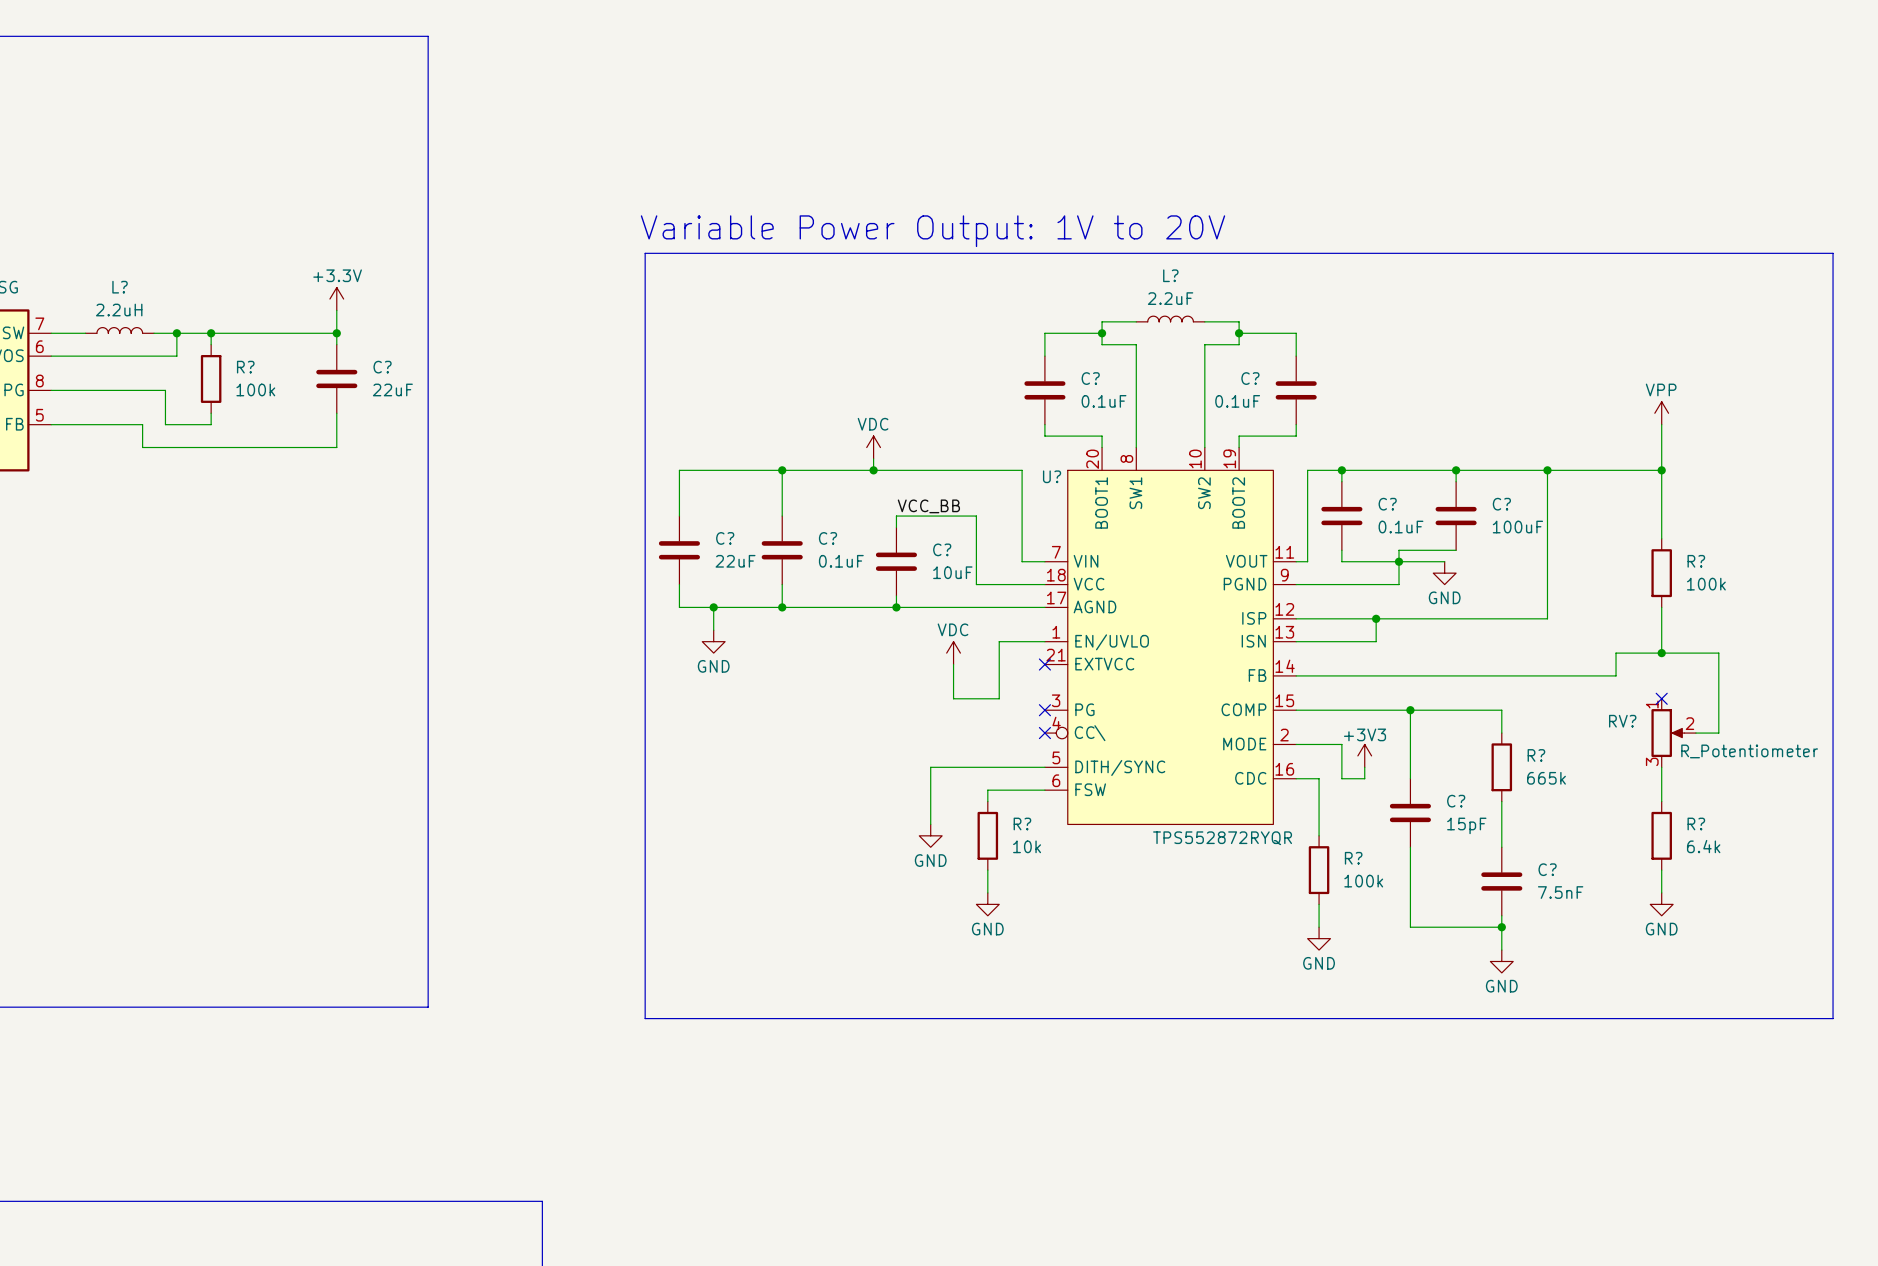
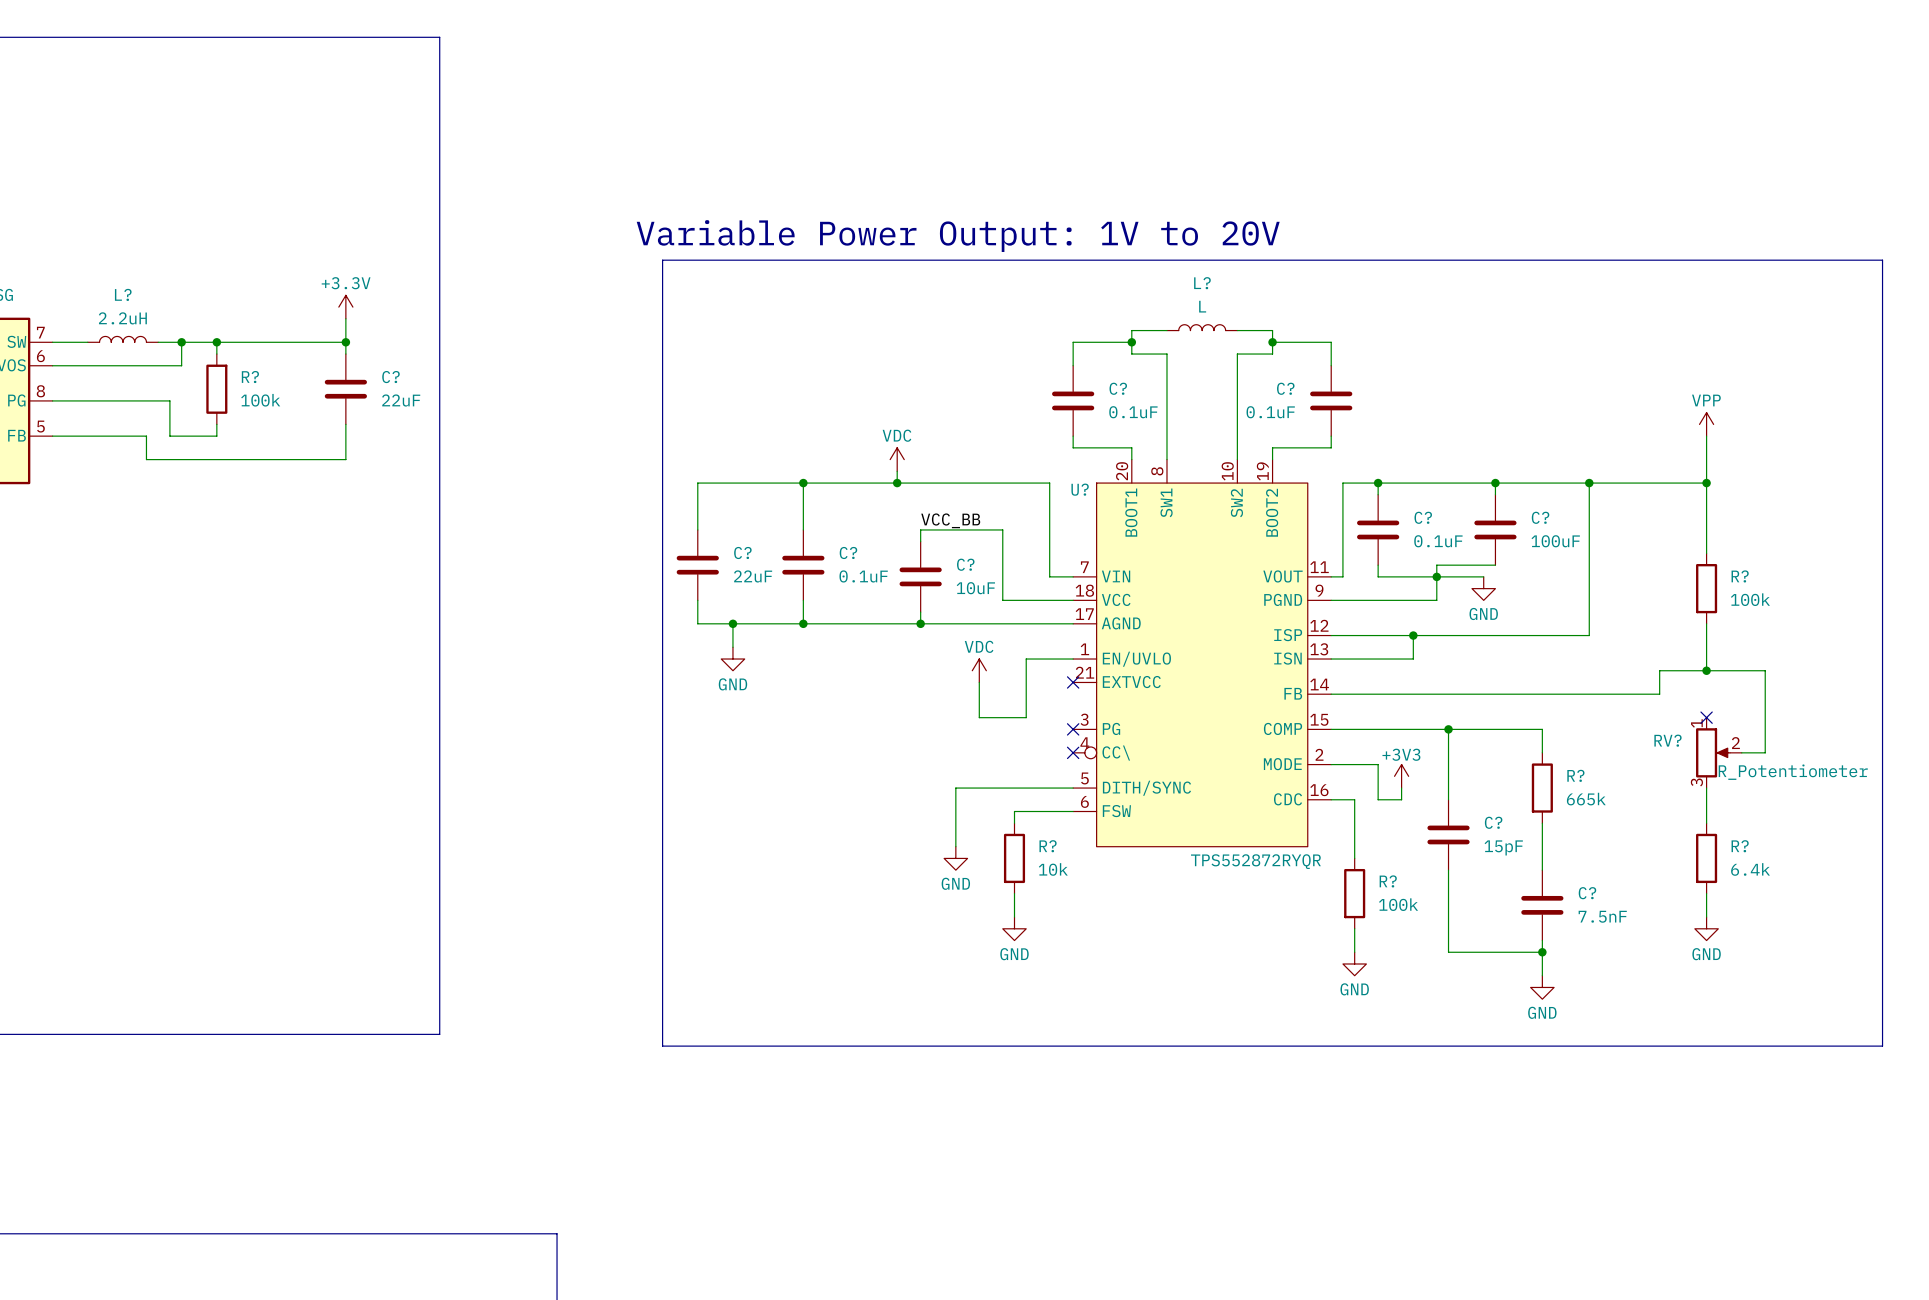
L? value: 2.2uF (1170, 298) -> L (1202, 306)

